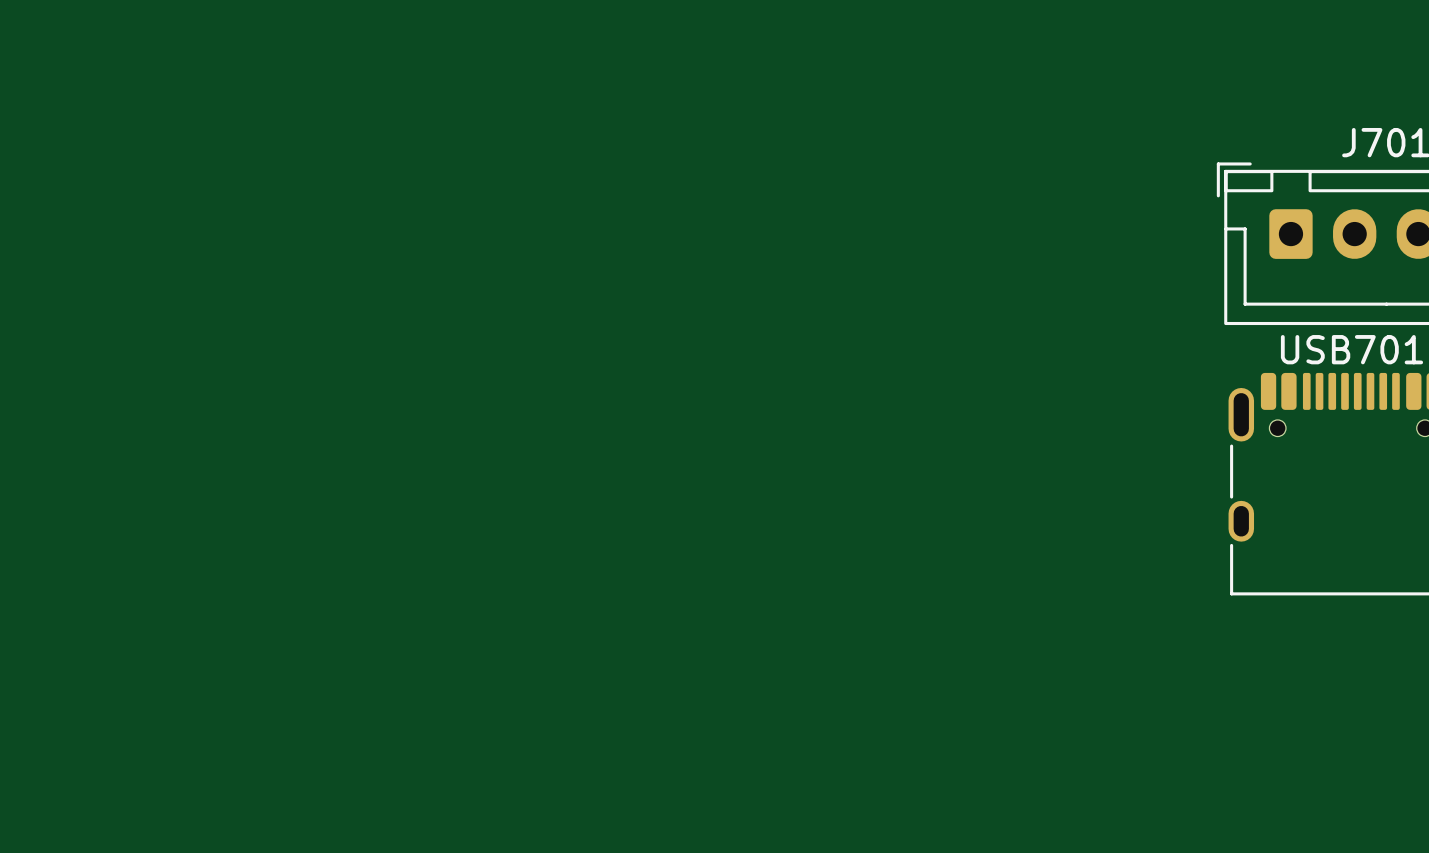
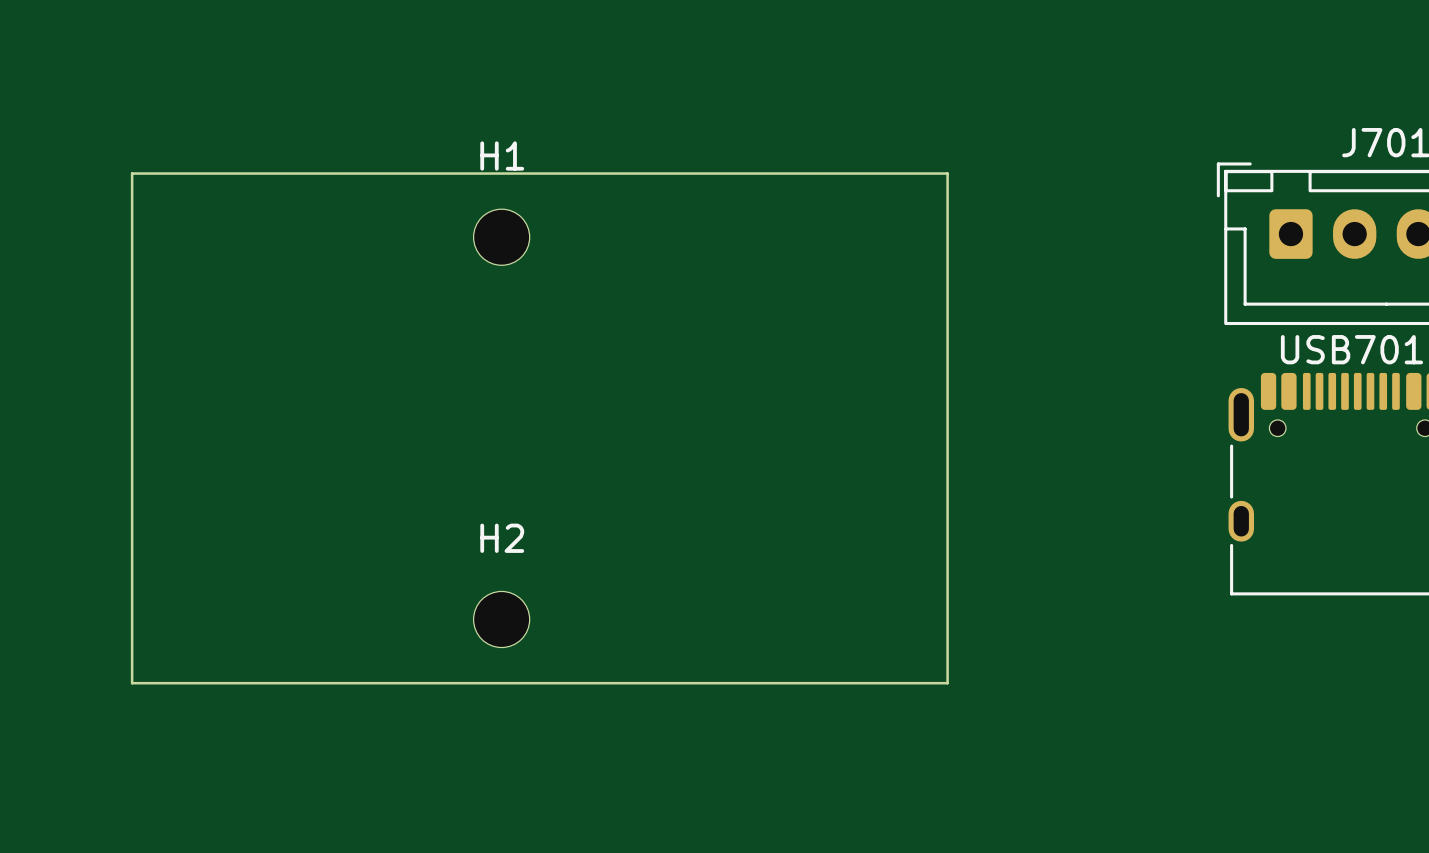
board edge: none -> (132, 173) (947, 173) (947, 683) (132, 683) (132, 173)
H1: none -> (501, 237)
H2: none -> (501, 619)

